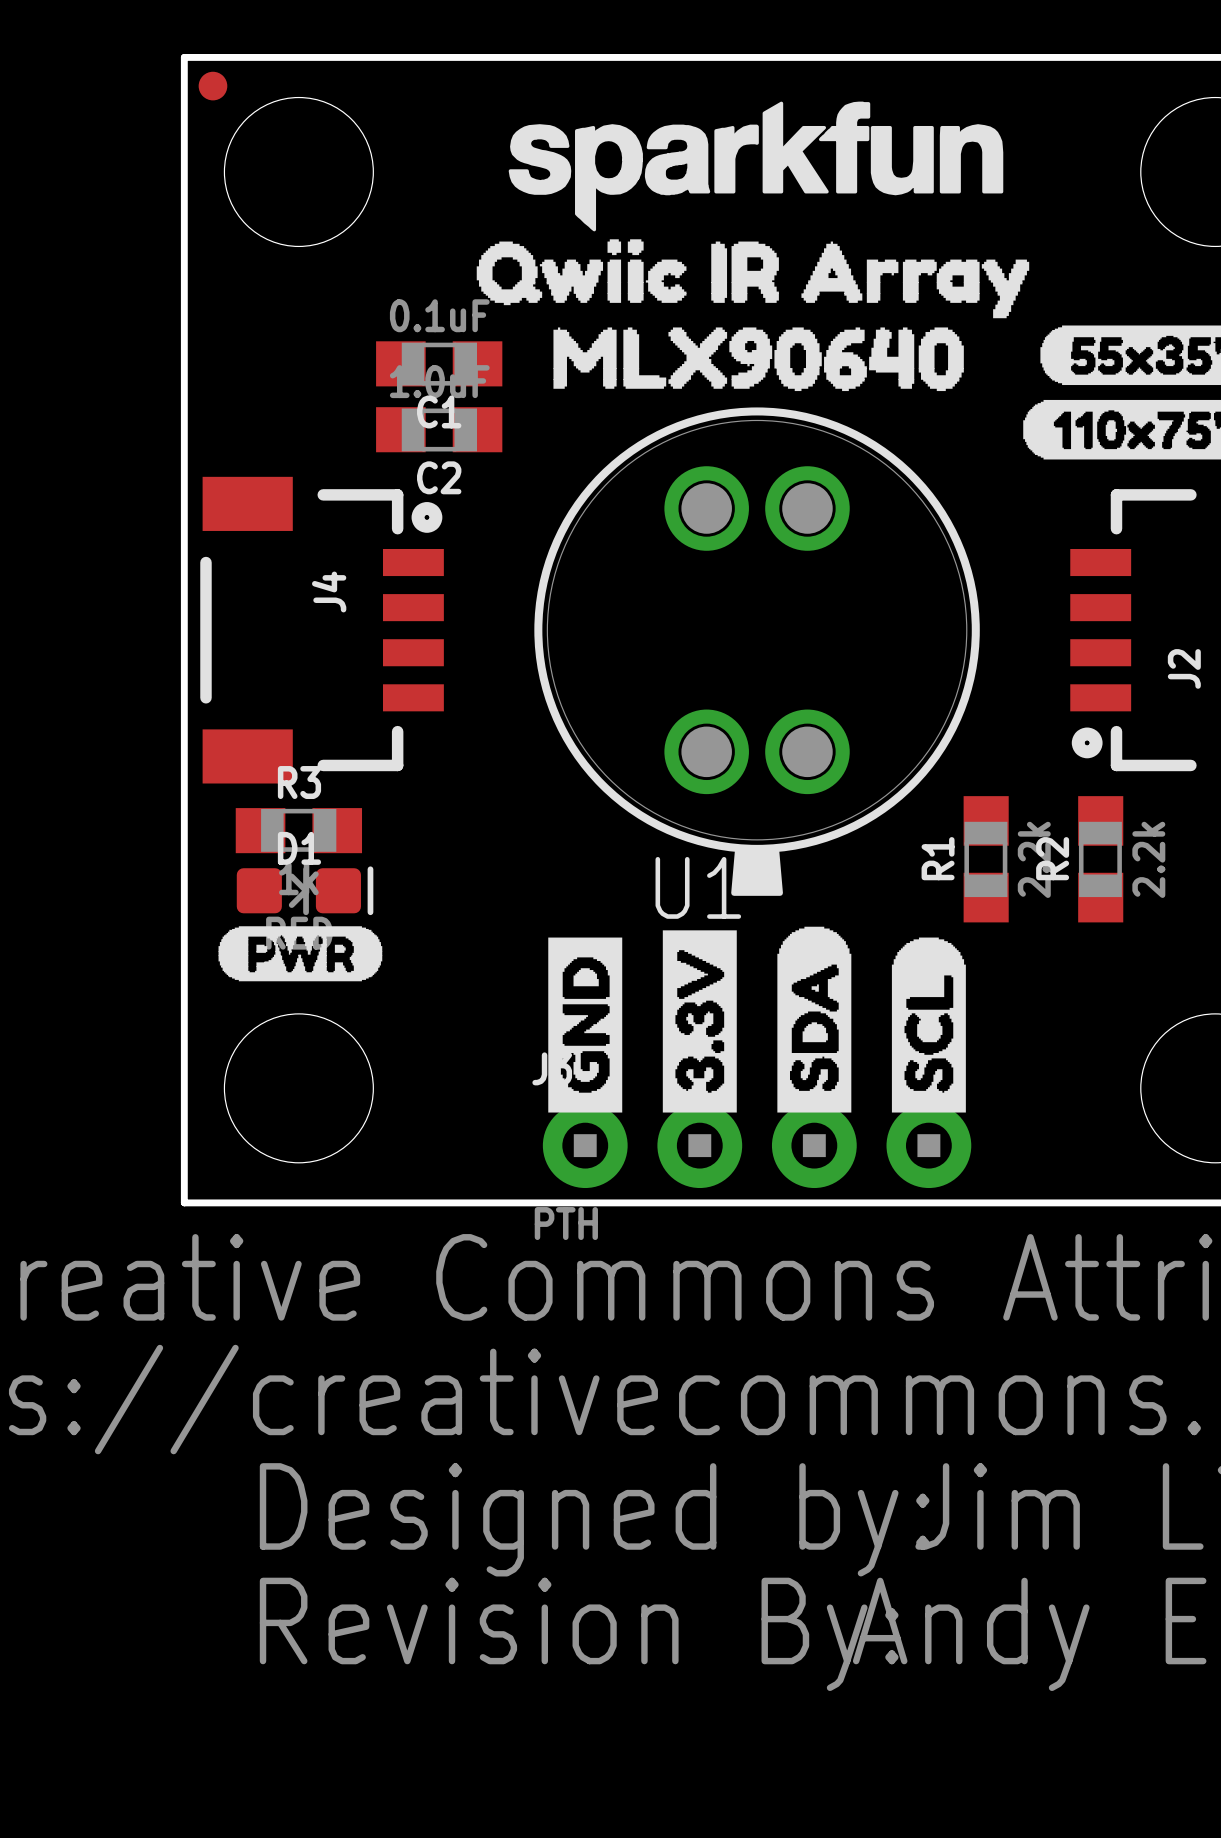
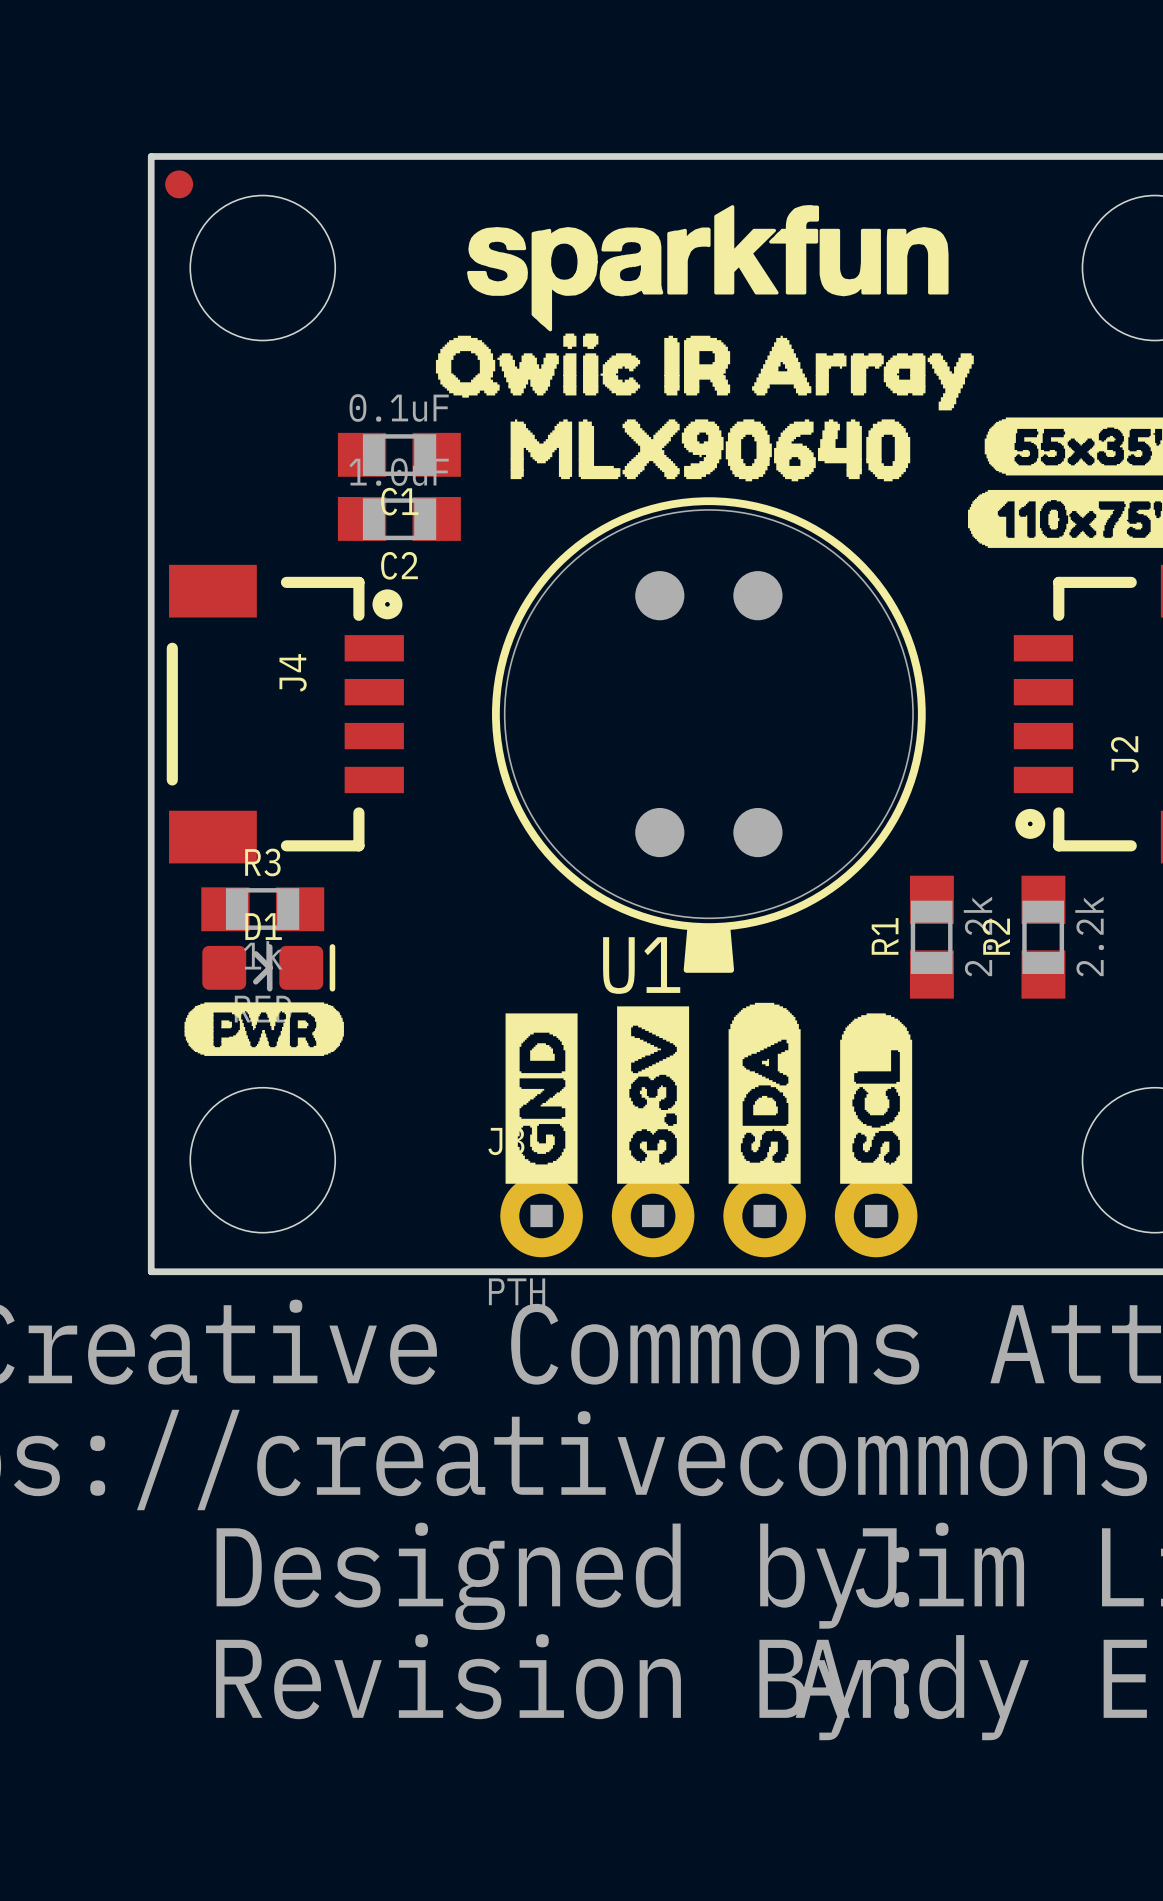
drawing shape: [508, 101, 1004, 232] -> [467, 205, 949, 332]
U1 footprint: [534, 407, 980, 896] -> [492, 497, 926, 973]

